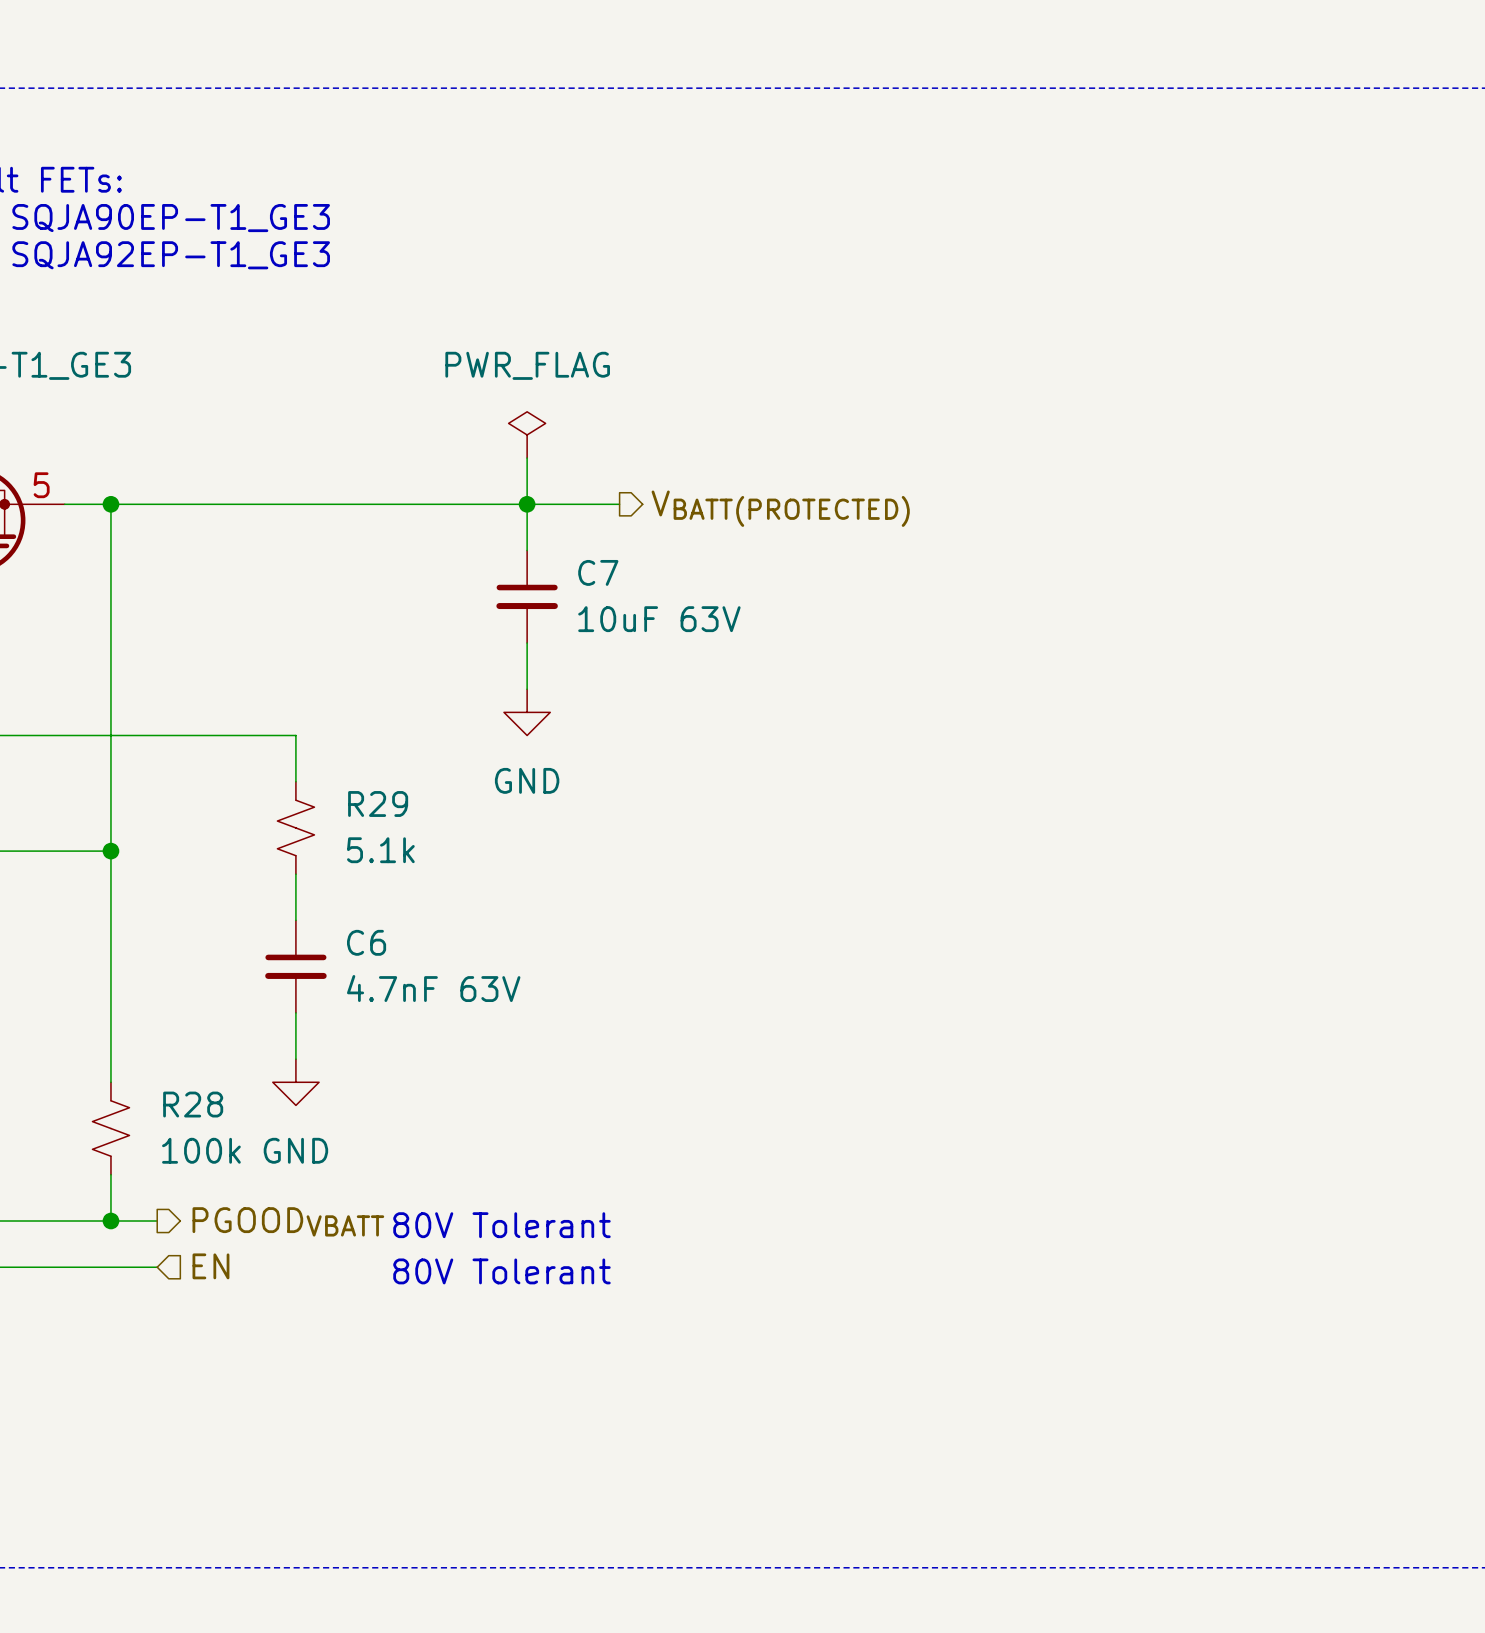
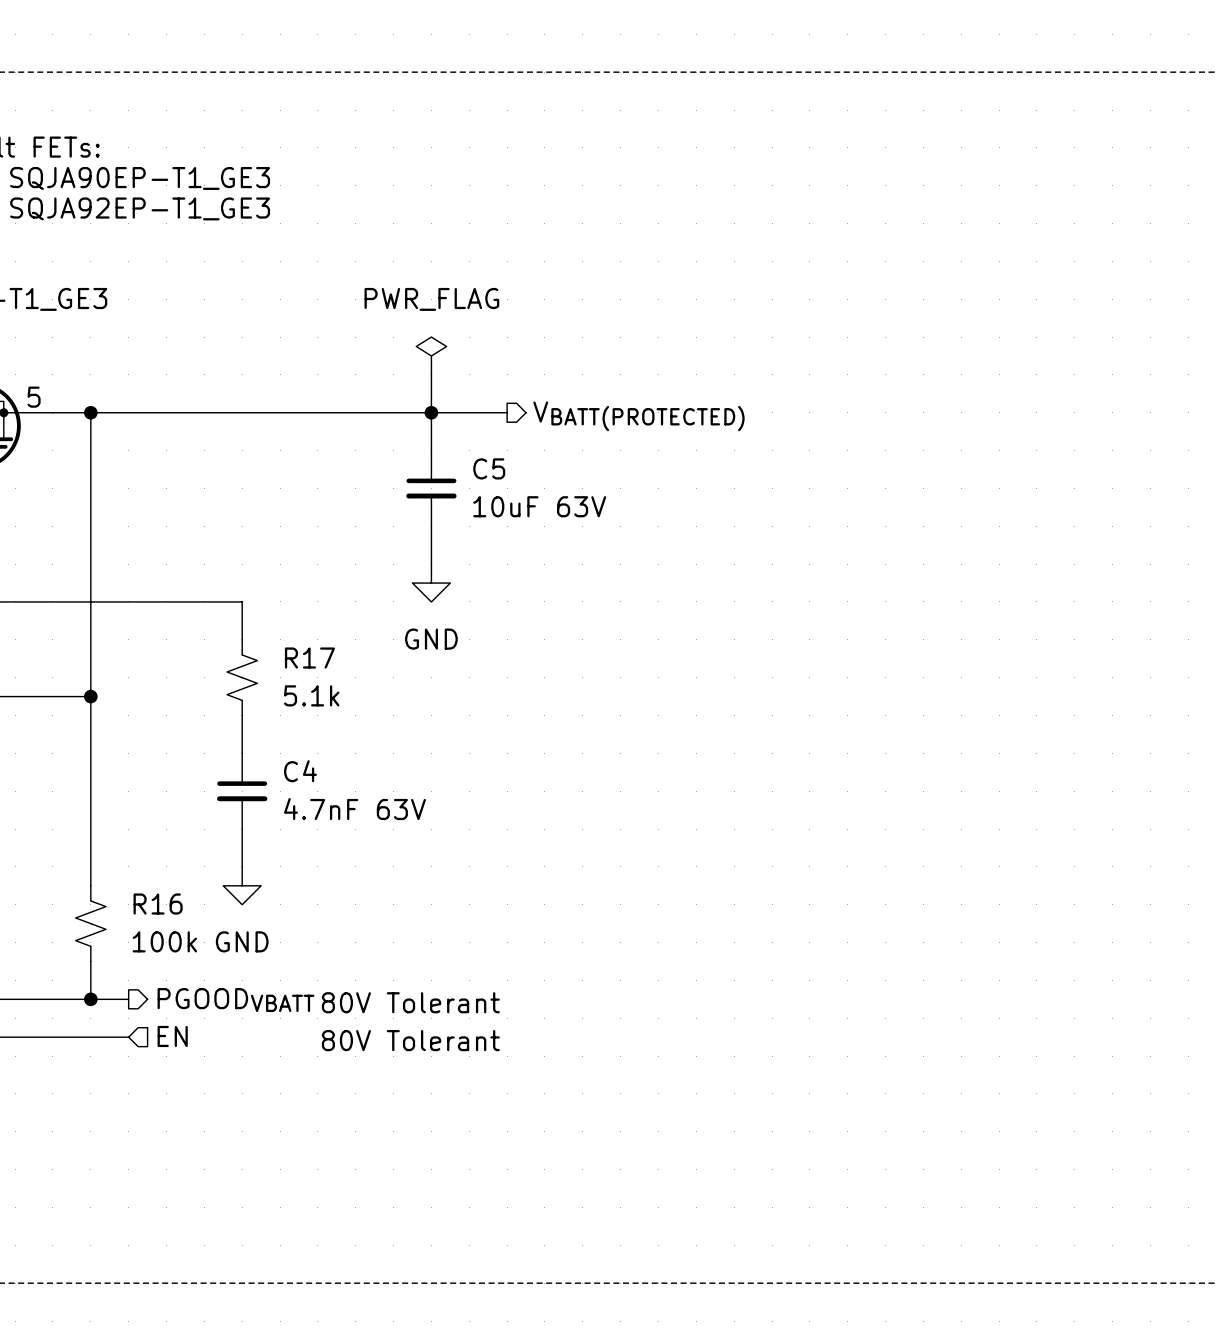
C7 name: C7 (598, 572) -> C5 (489, 468)
R29 name: R29 (378, 803) -> R17 (309, 658)
C6 name: C6 (366, 942) -> C4 (300, 771)
R28 name: R28 (193, 1104) -> R16 (158, 904)

